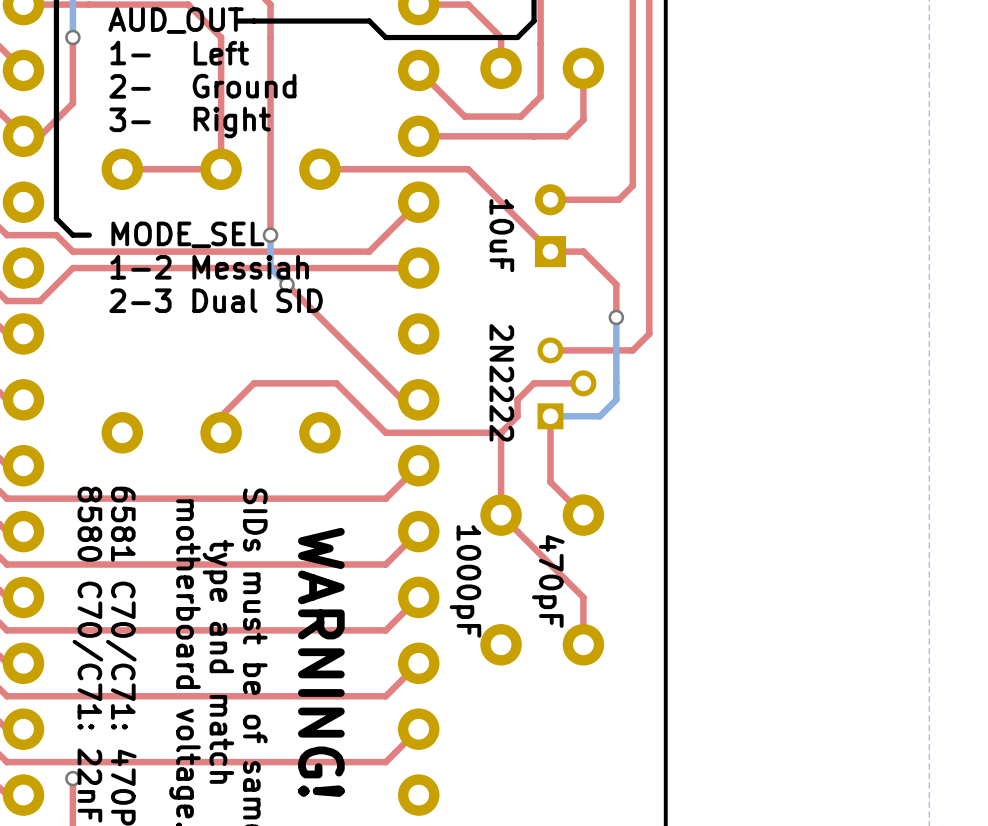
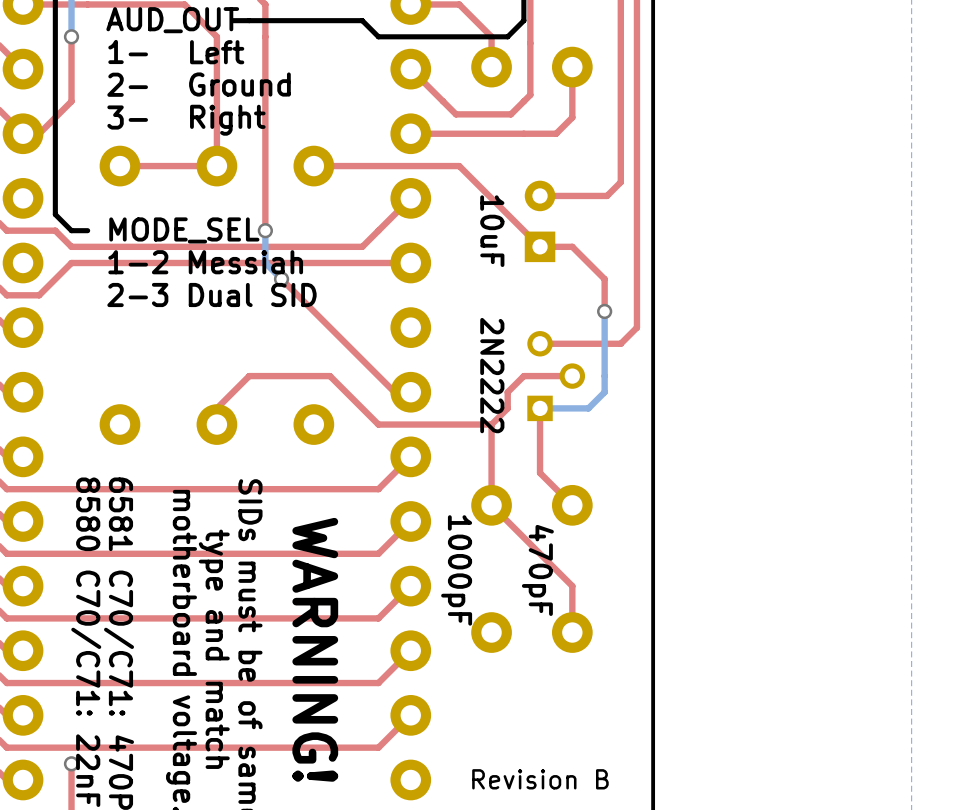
text: none -> Revision B (540, 779)

